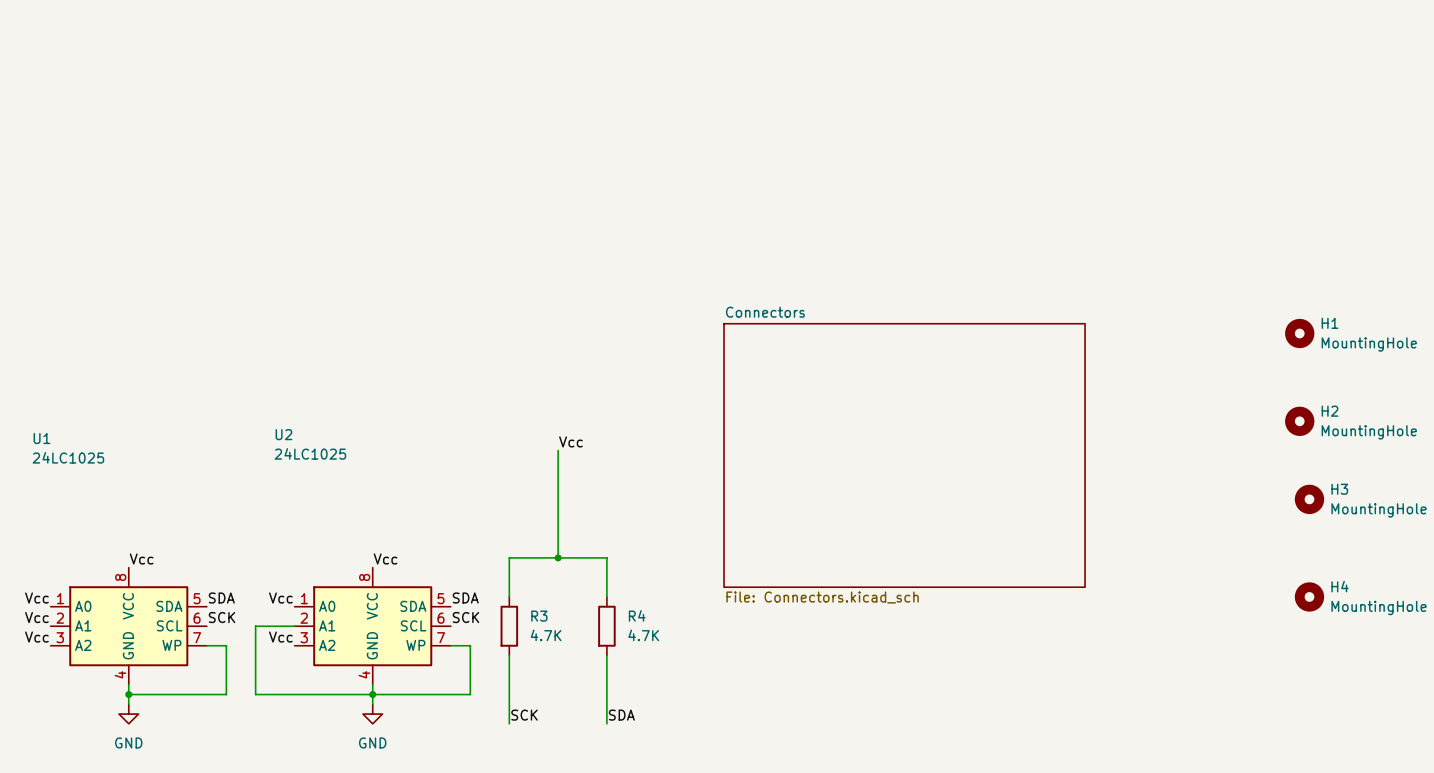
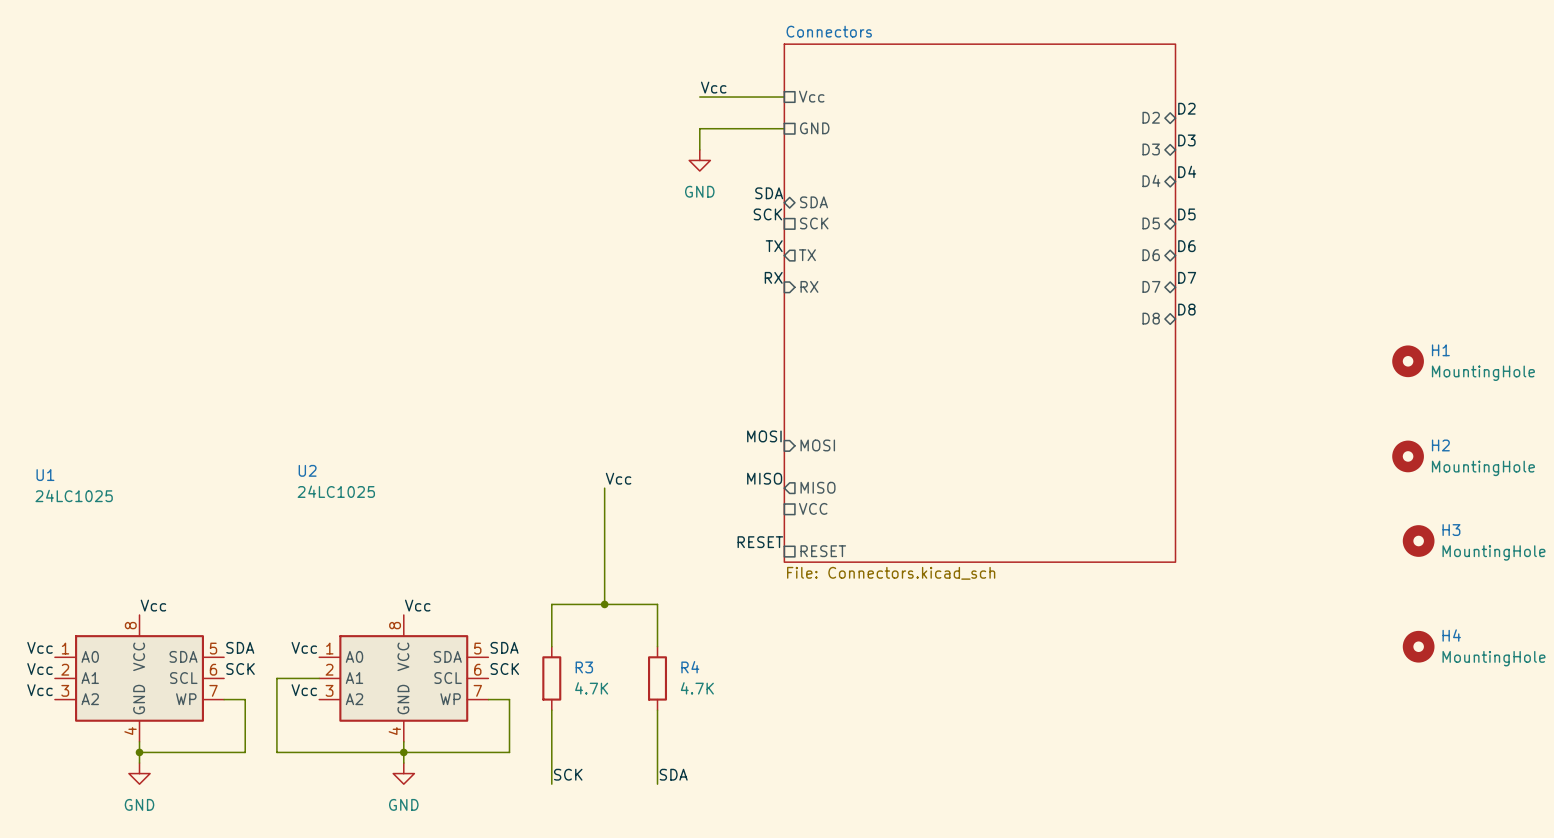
label: none -> Vcc (713, 87)
wire: none -> (699, 97) (784, 97)
sheet pin: none -> Vcc (811, 96)
label: none -> D2 (1186, 108)
sheet pin: none -> D2 (1151, 117)
wire: none -> (784, 128) (699, 128) (699, 149)
sheet pin: none -> GND (814, 128)
label: none -> D3 (1186, 140)
sheet pin: none -> D3 (1151, 149)
power symbol: none -> GND (699, 160)
label: none -> D4 (1187, 171)
sheet pin: none -> D4 (1151, 180)
label: none -> SDA (769, 193)
sheet pin: none -> SDA (813, 202)
label: none -> SCK (767, 214)
label: none -> D5 (1186, 214)
sheet pin: none -> SCK (814, 223)
sheet pin: none -> D5 (1151, 223)
label: none -> TX (774, 246)
label: none -> D6 (1186, 246)
sheet pin: none -> TX (807, 255)
sheet pin: none -> D6 (1151, 255)
label: none -> RX (773, 277)
label: none -> D7 (1187, 277)
sheet pin: none -> RX (809, 286)
sheet pin: none -> D7 (1151, 286)
sheet Connectors: none -> File: Connectors.kicad_sch (979, 303)
label: none -> D8 (1186, 309)
sheet pin: none -> D8 (1151, 318)
label: none -> MOSI (764, 436)
sheet pin: none -> MOSI (817, 445)
label: none -> MISO (764, 478)
sheet pin: none -> MISO (818, 487)
sheet Connectors: File: Connectors.kicad_sch (904, 455) -> none
sheet pin: none -> VCC (813, 508)
label: none -> RESET (760, 542)
sheet pin: none -> RESET (823, 551)

